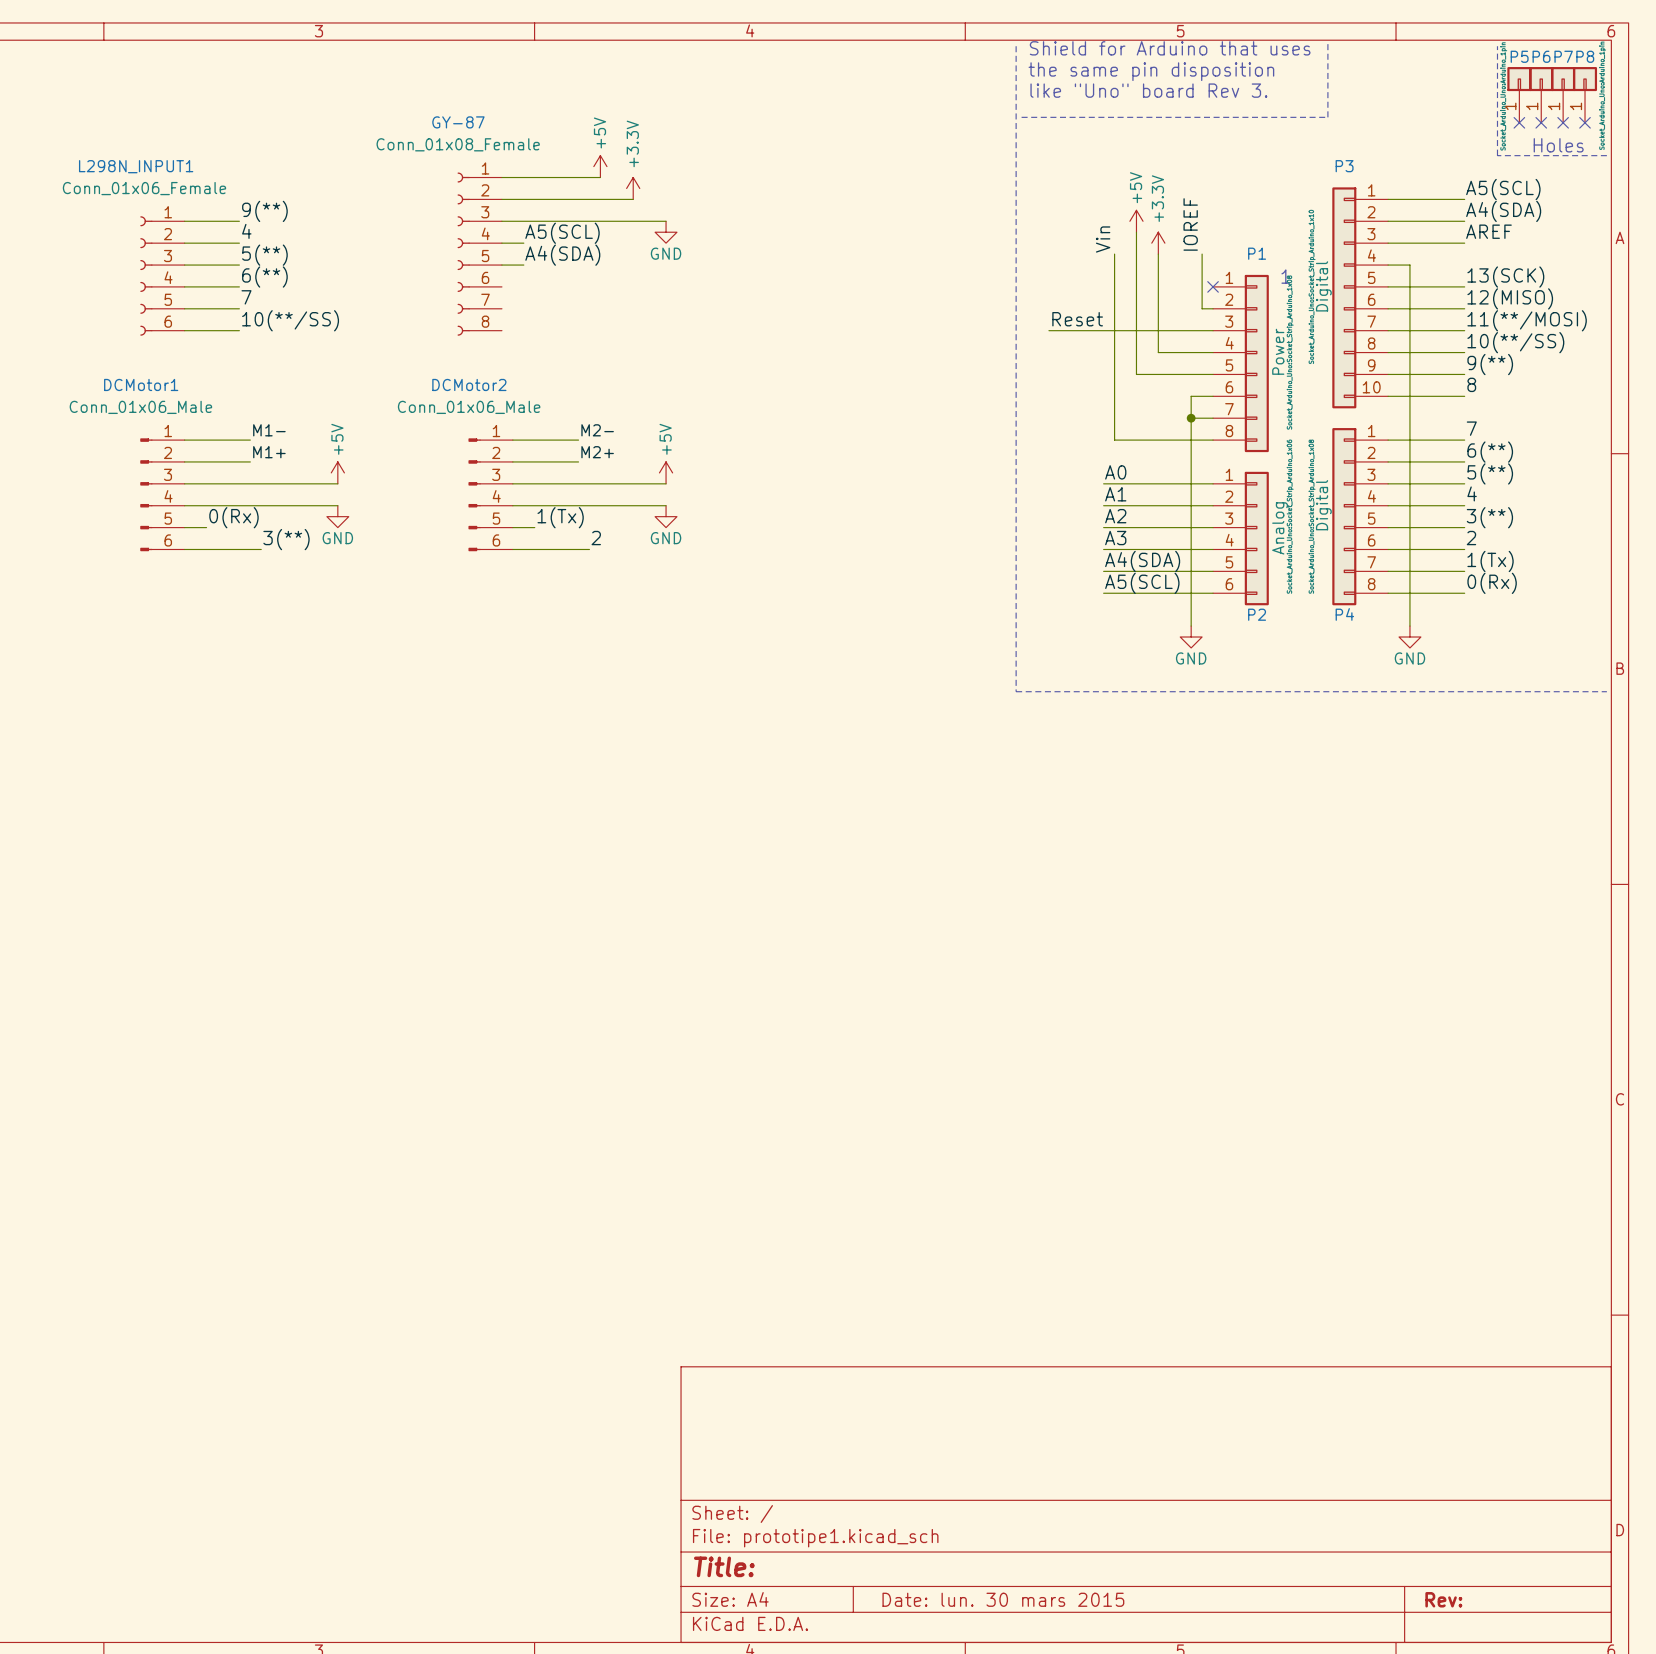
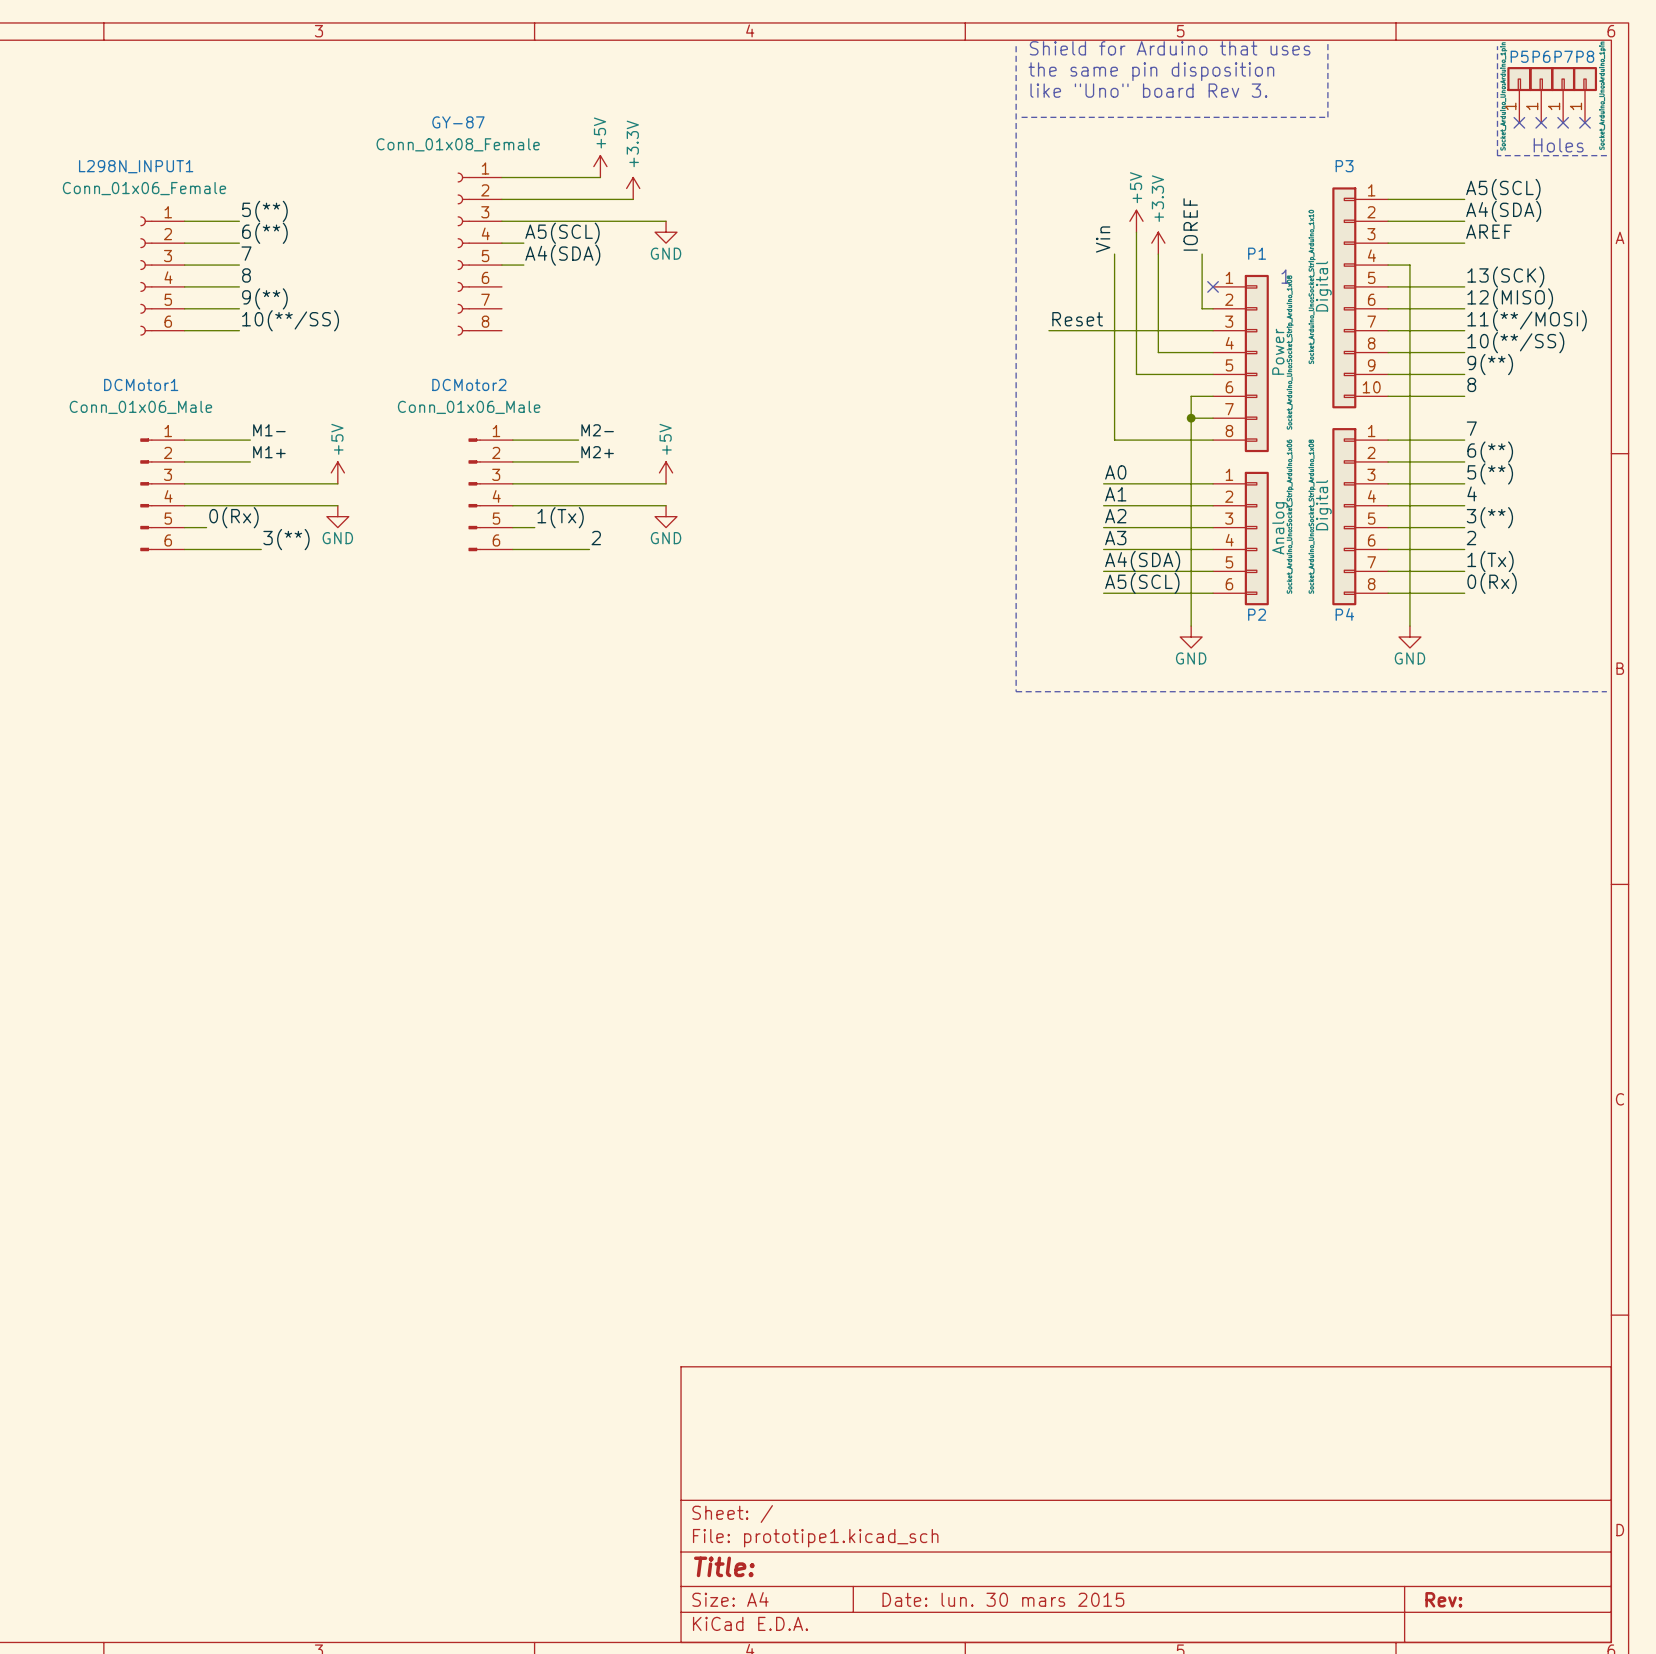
label: 9(**) (264, 211) -> 5(**) (264, 211)
label: 4 (246, 231) -> 6(**) (264, 233)
label: 5(**) (264, 255) -> 7 (246, 253)
label: 6(**) (264, 277) -> 8 (246, 275)
label: 7 (246, 297) -> 9(**) (264, 298)

